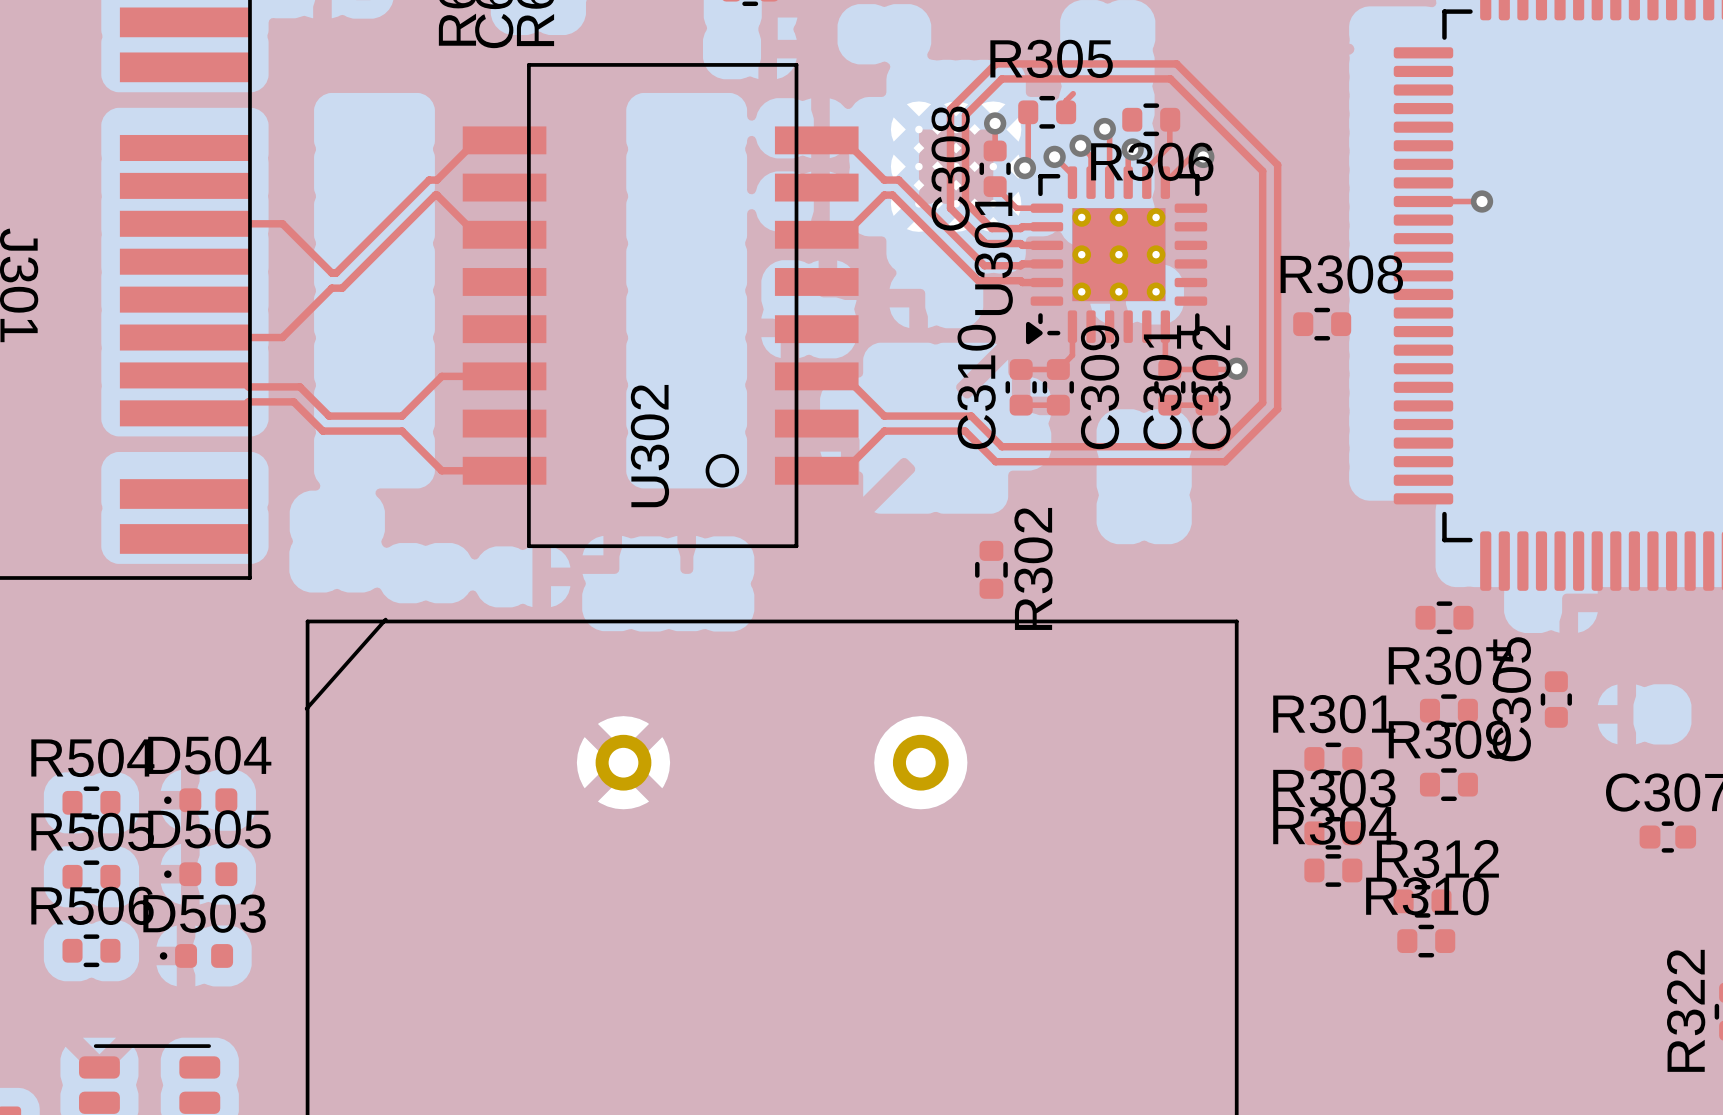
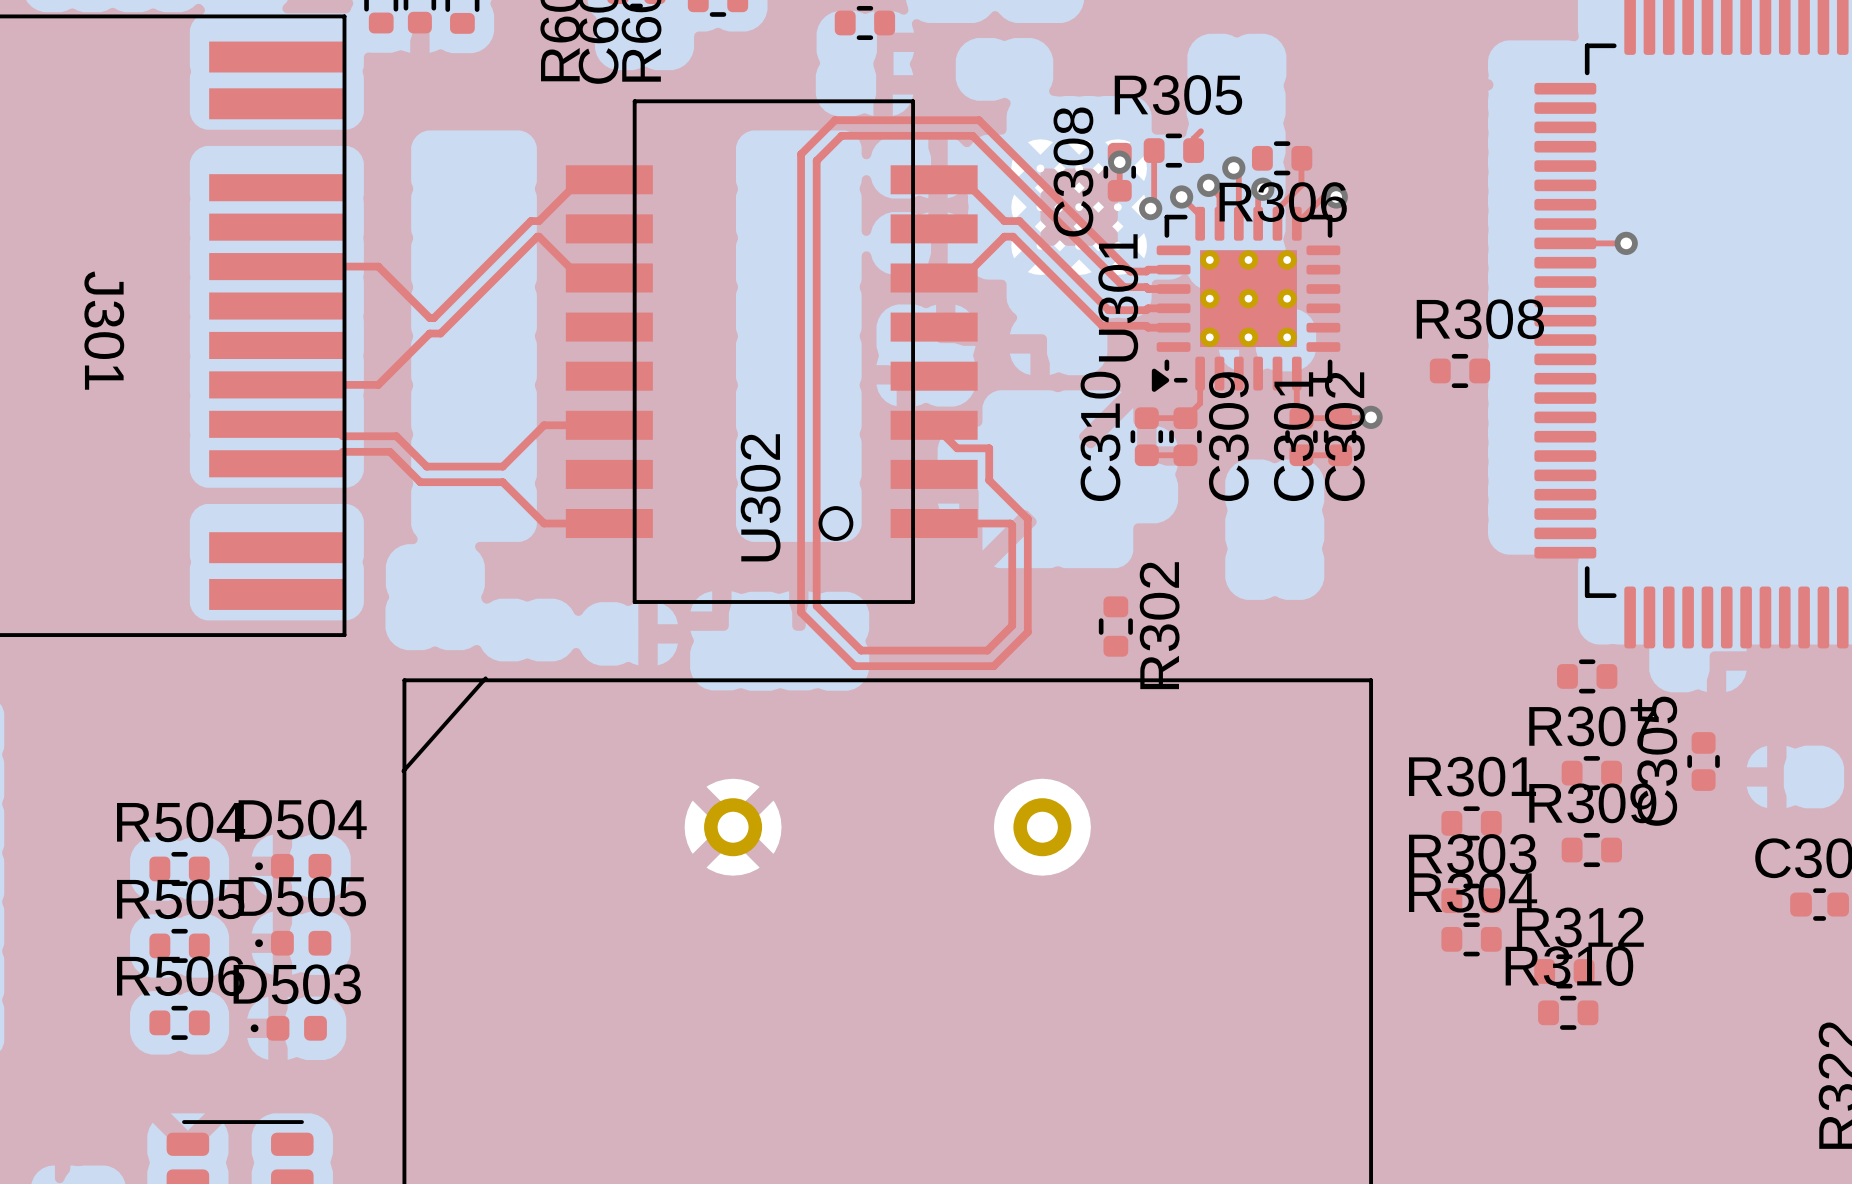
C308 position: (995, 168) -> (1119, 172)
top track: (995, 186) (1016, 208) (1046, 208) -> none
top track: (1005, 228) (991, 228) (965, 202) (965, 115) (1001, 78) (1170, 78) (1262, 171) (1262, 402) (1218, 446) (1001, 446) (971, 416) (884, 416) (844, 376) -> (1130, 271) (979, 120) (835, 120) (801, 154) (801, 612) (854, 666) (993, 666) (1027, 632) (1027, 518) (989, 480) (989, 448) (957, 448) (934, 425)
top track: (999, 243) (985, 243) (950, 208) (950, 109) (995, 63) (1176, 63) (1277, 164) (1277, 409) (1224, 461) (995, 461) (965, 431) (884, 431) (844, 470) -> (1123, 287) (972, 135) (841, 135) (816, 160) (816, 606) (861, 650) (987, 650) (1012, 625) (1012, 525) (1010, 523) (963, 523)

